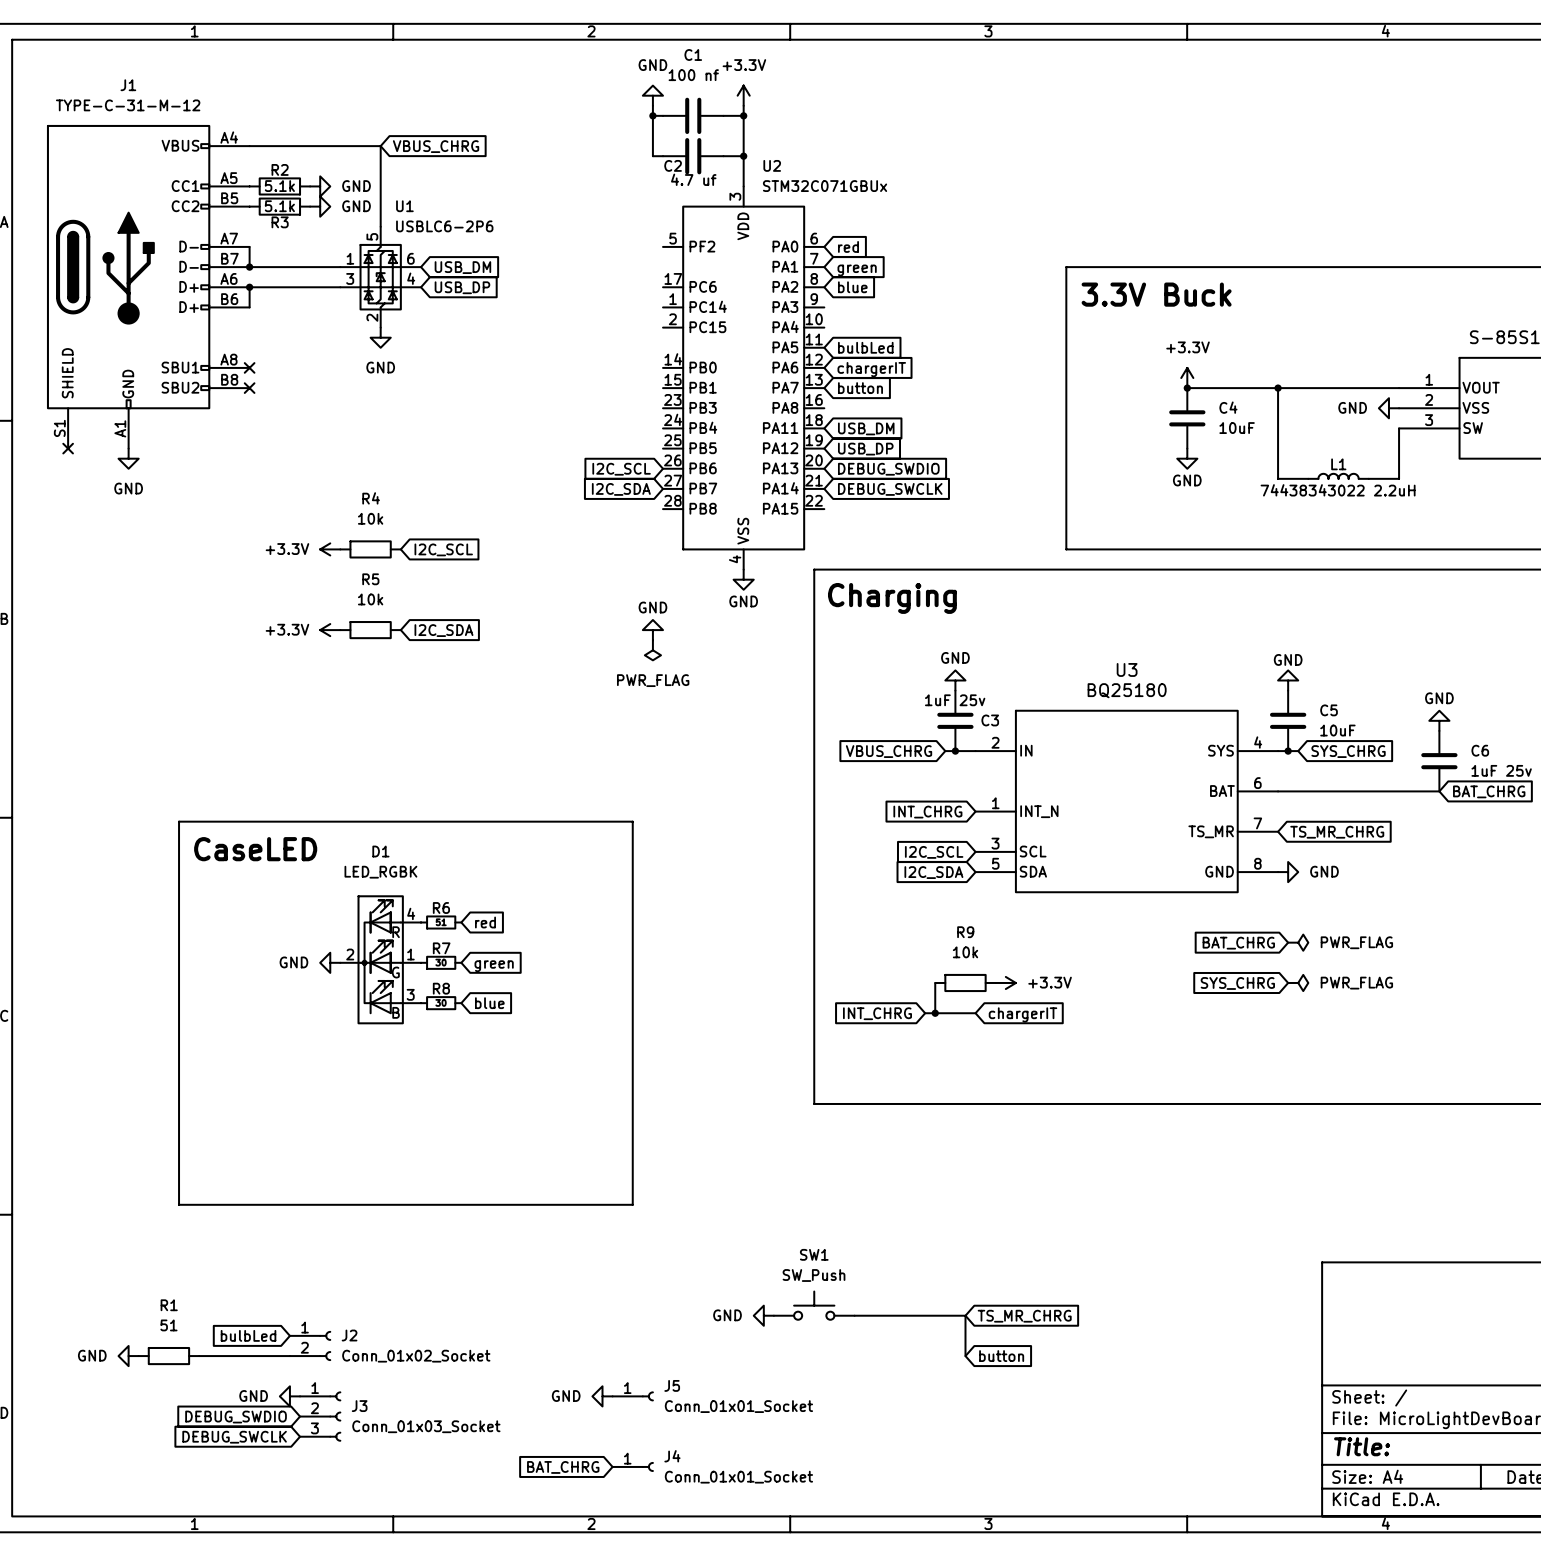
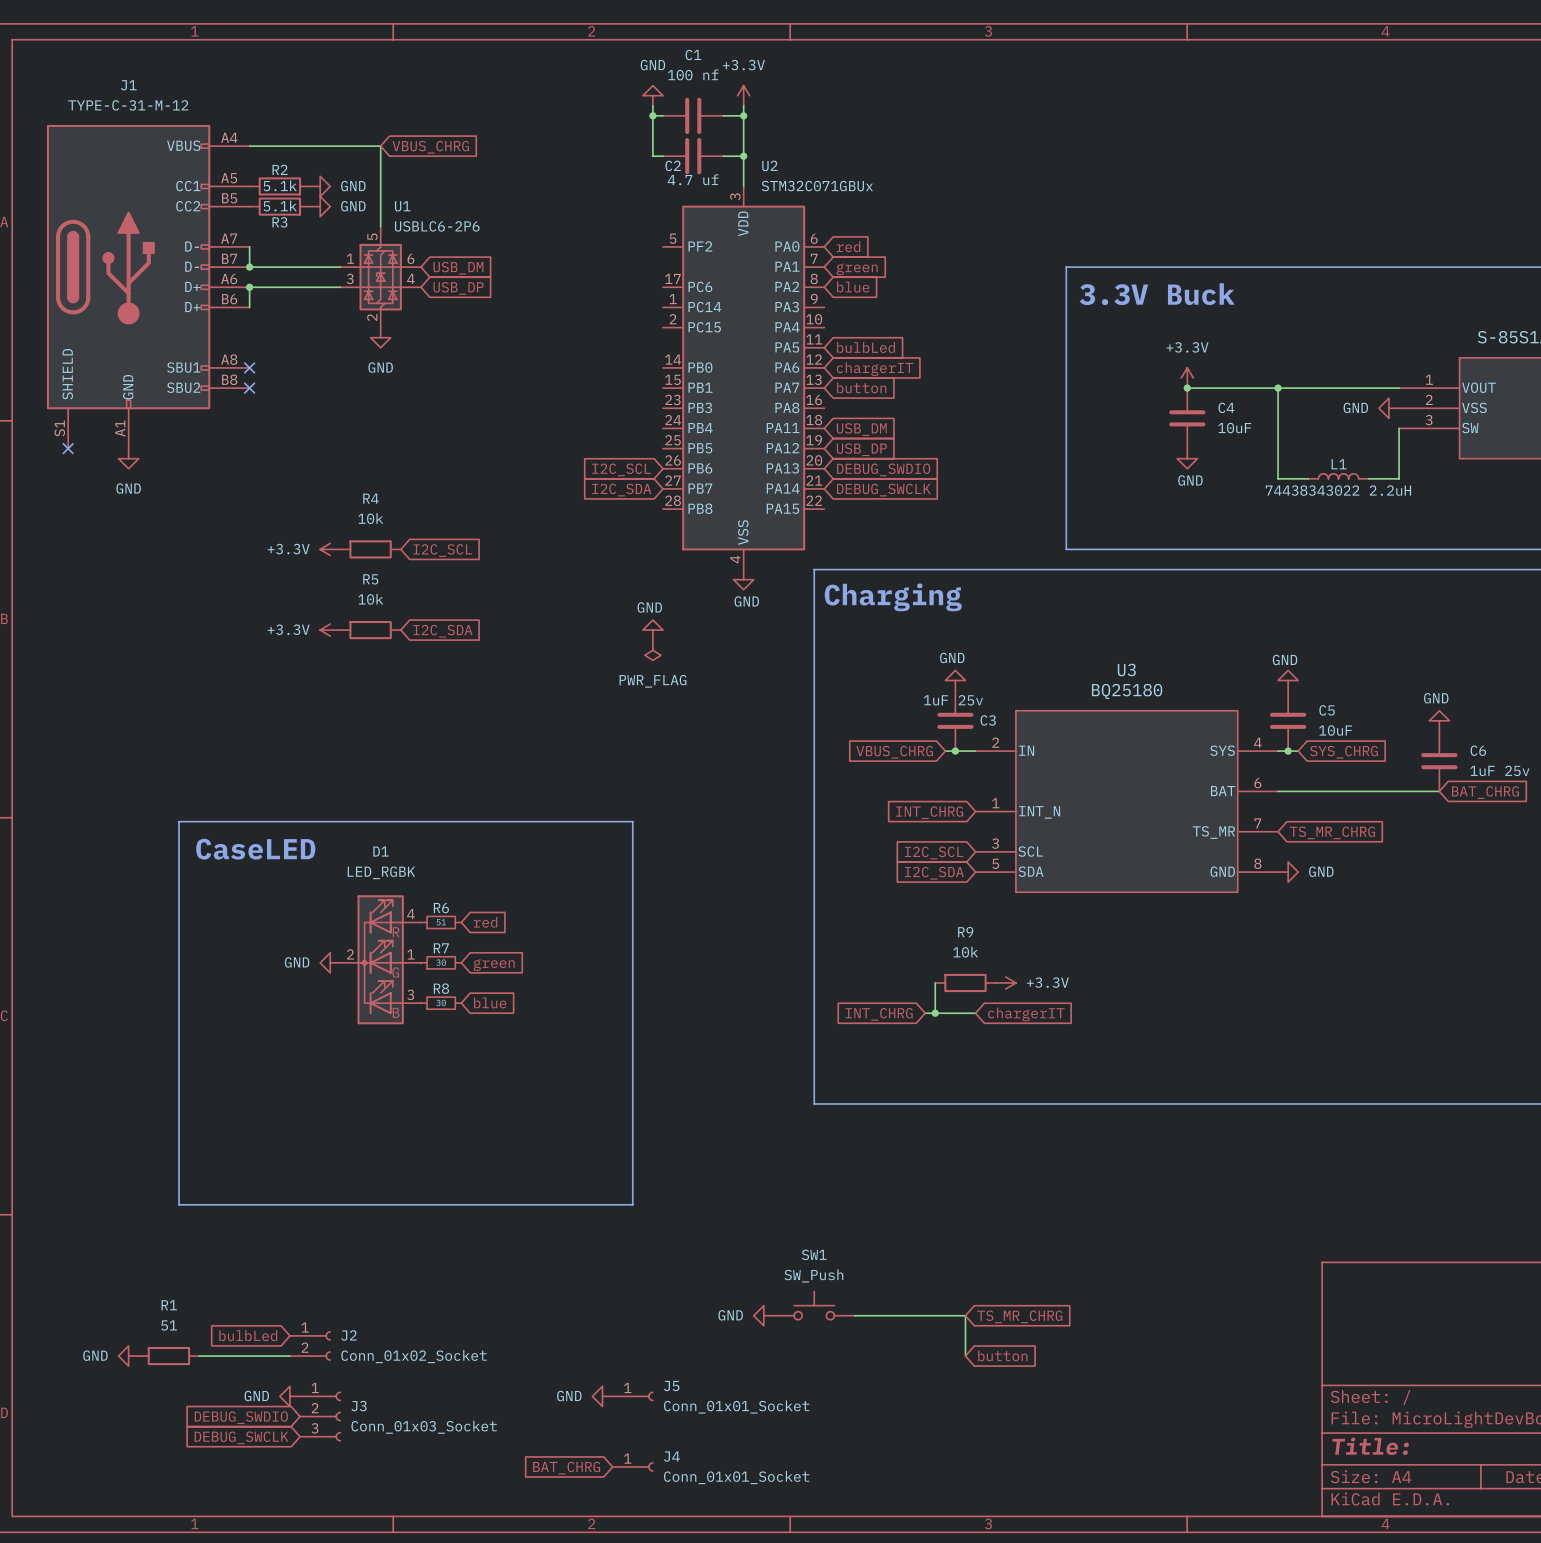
power symbol: PWR_FLAG (1298, 942) -> none
global label: BAT_CHRG (1238, 943) -> none
power symbol: PWR_FLAG (1298, 982) -> none
global label: SYS_CHRG (1237, 983) -> none

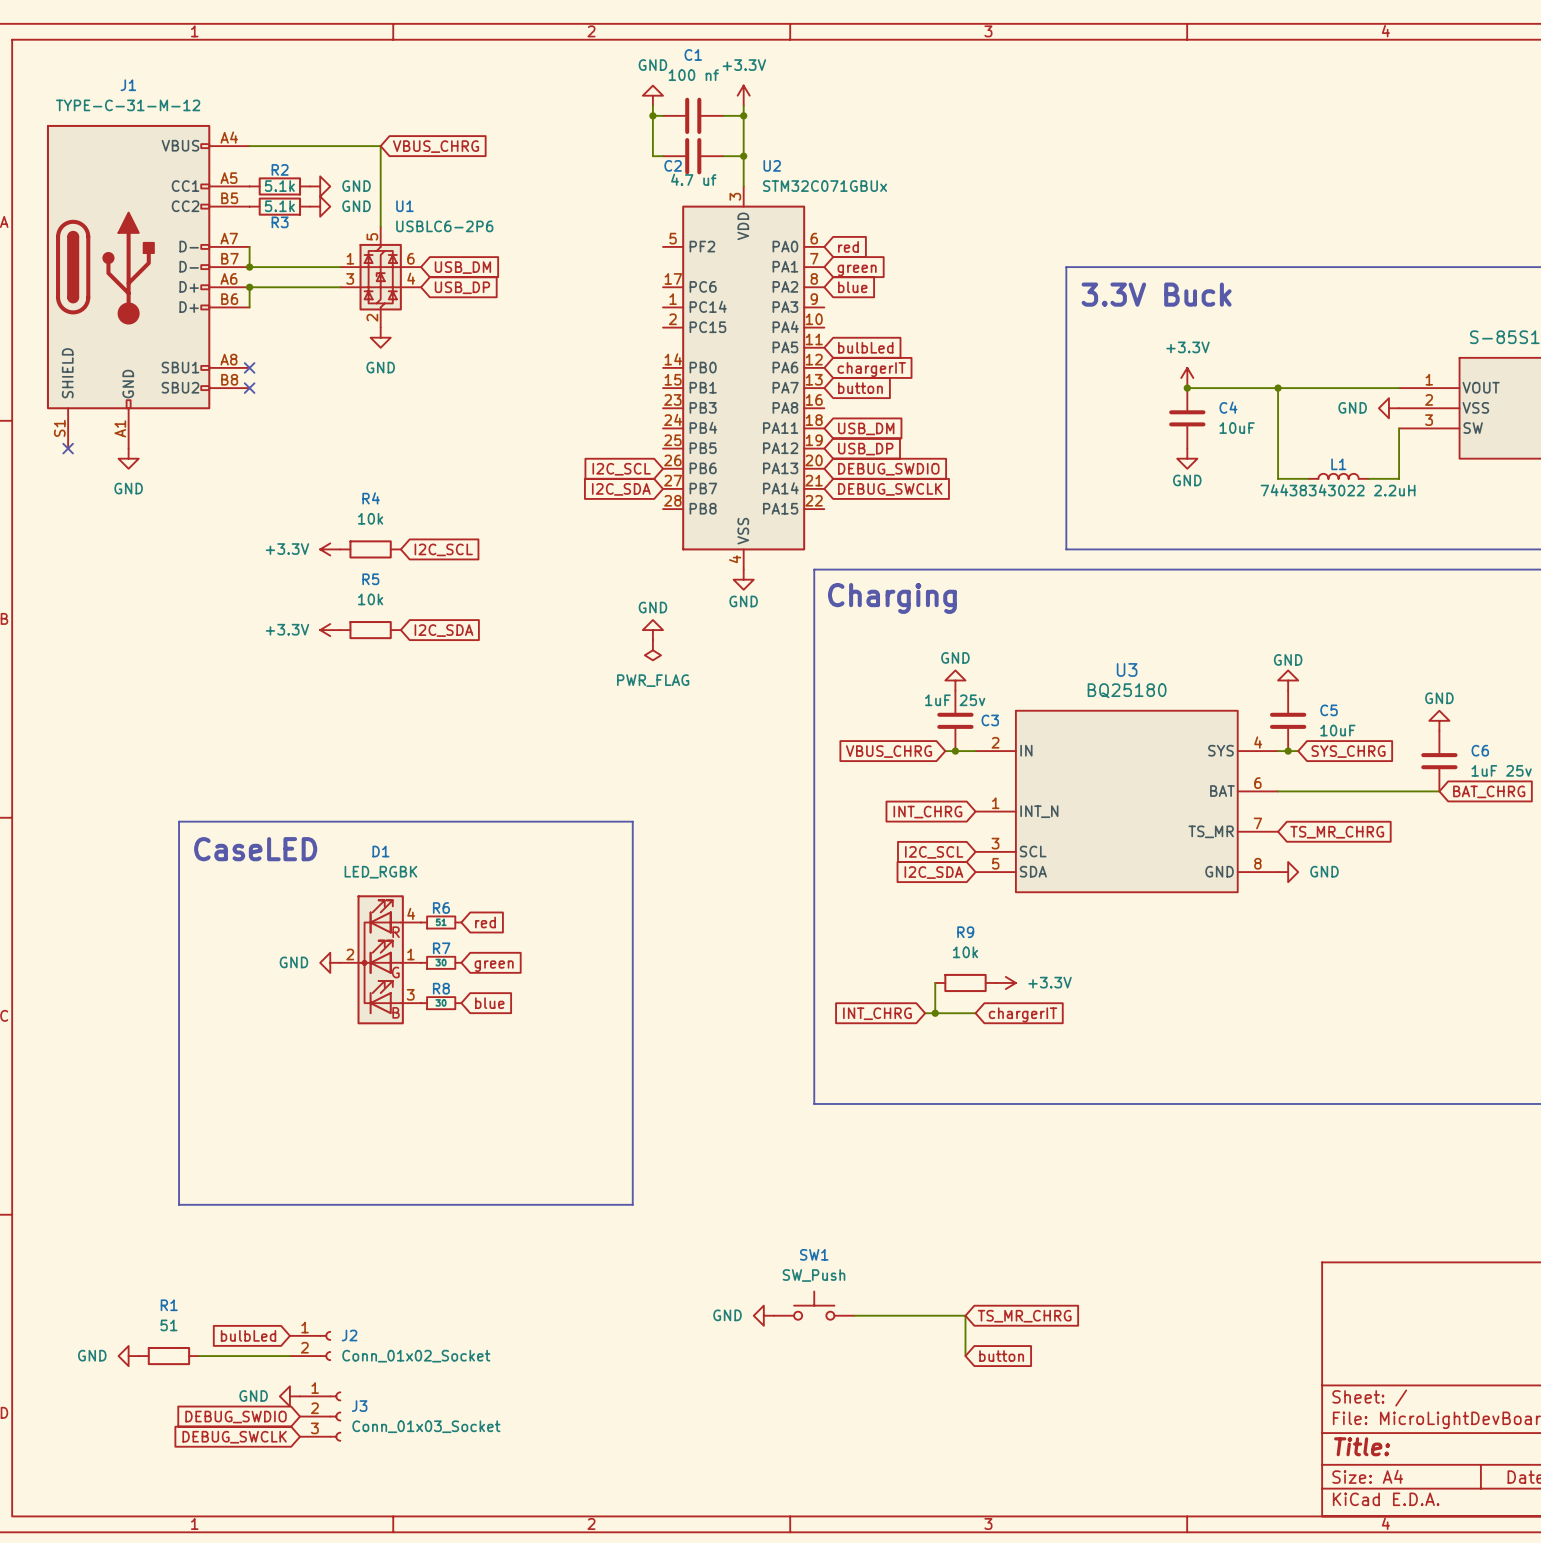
power symbol: GND (602, 1396) -> none
J5: Conn_01x01_Socket (633, 1396) -> none
J4: Conn_01x01_Socket (633, 1466) -> none
global label: BAT_CHRG (566, 1468) -> none

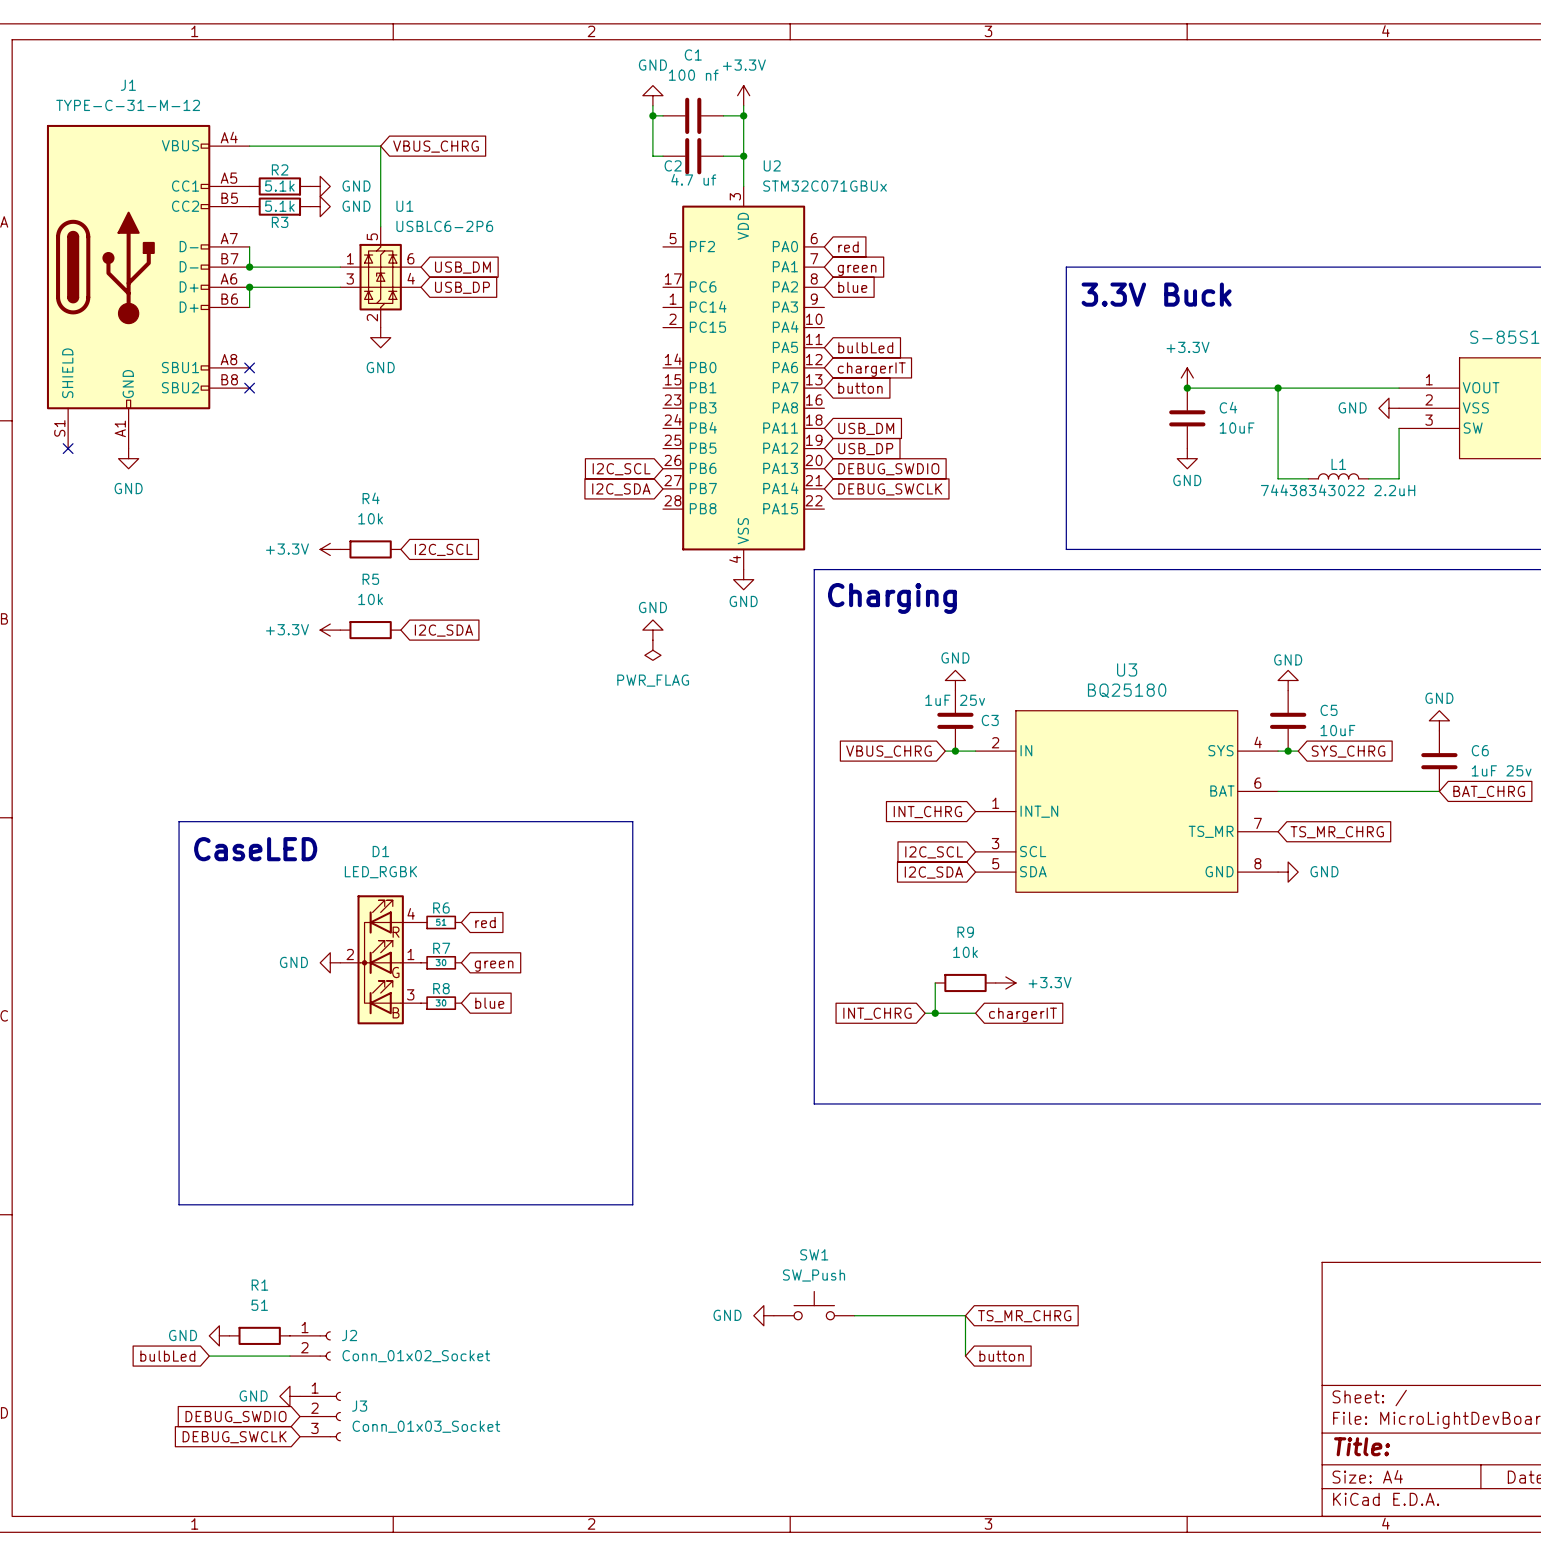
global label position: bulbLed (248, 1335) -> bulbLed (167, 1356)
power symbol position: GND (128, 1356) -> GND (219, 1335)
R1 position: (168, 1356) -> (259, 1335)
wire: (199, 1356) (209, 1356) -> none

